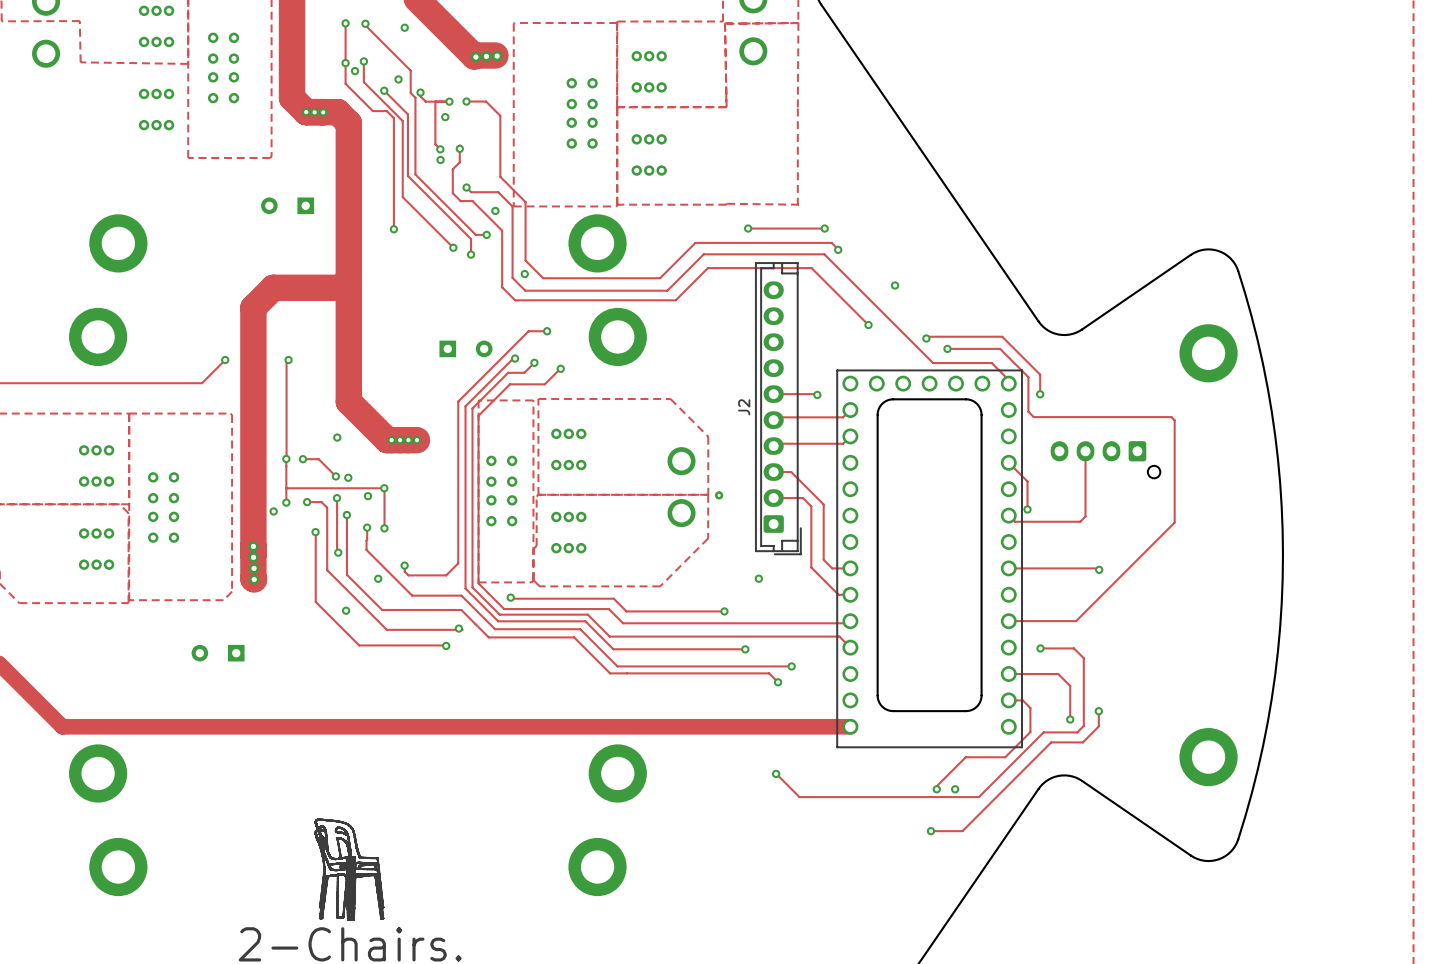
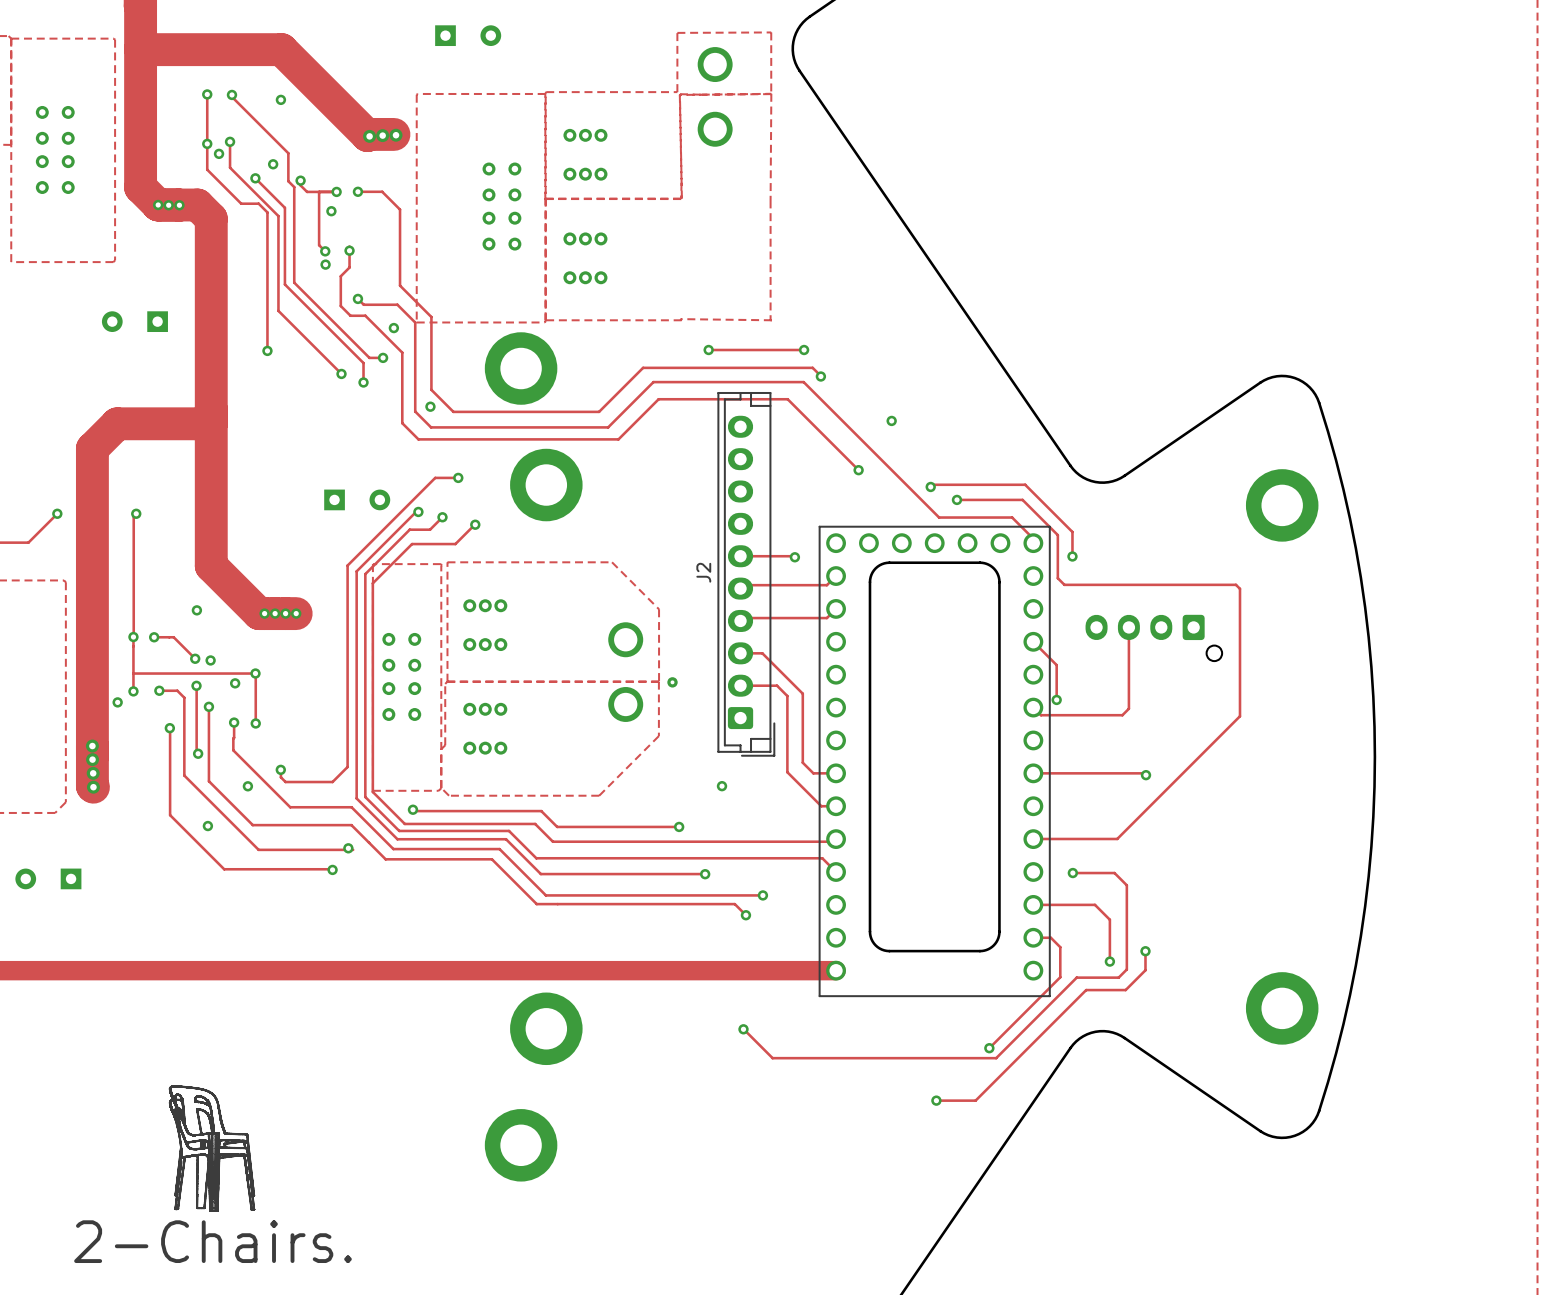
track: (1005, 757) (965, 757) (936, 786) (936, 789) -> (1028, 1008) (989, 1048)
via: (936, 789) -> none
via: (955, 789) -> none
via: none -> (989, 1048)

